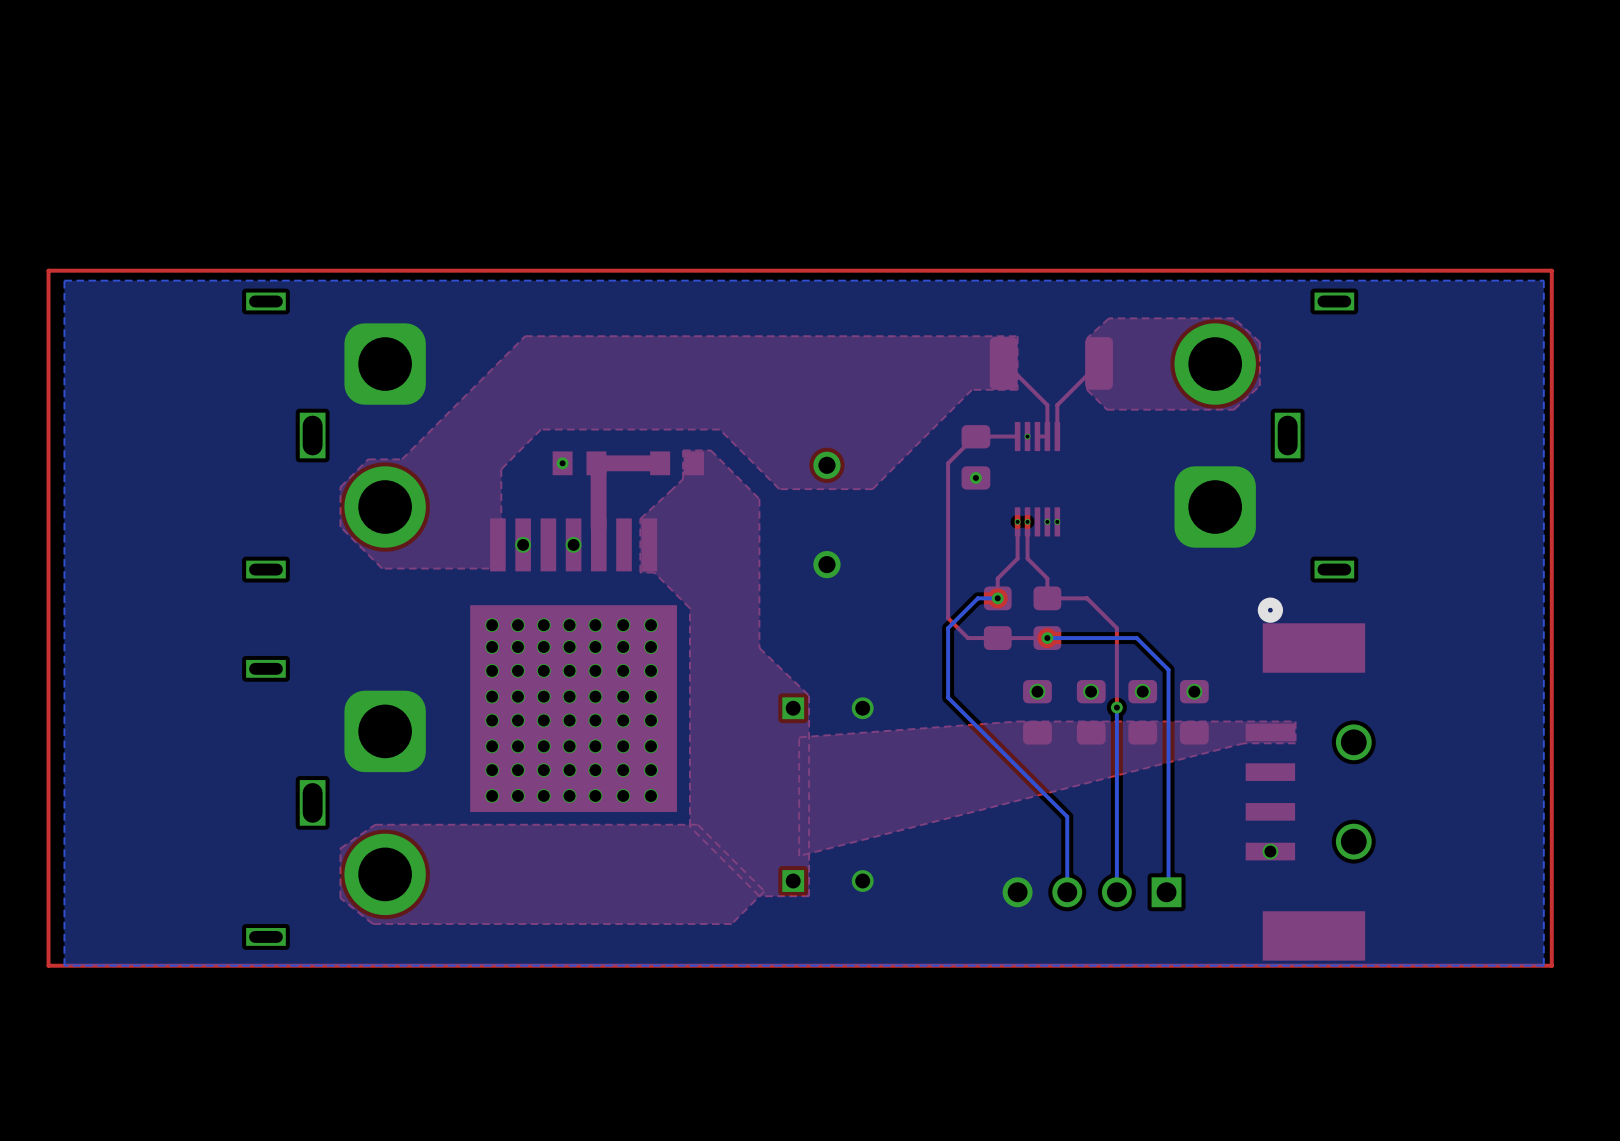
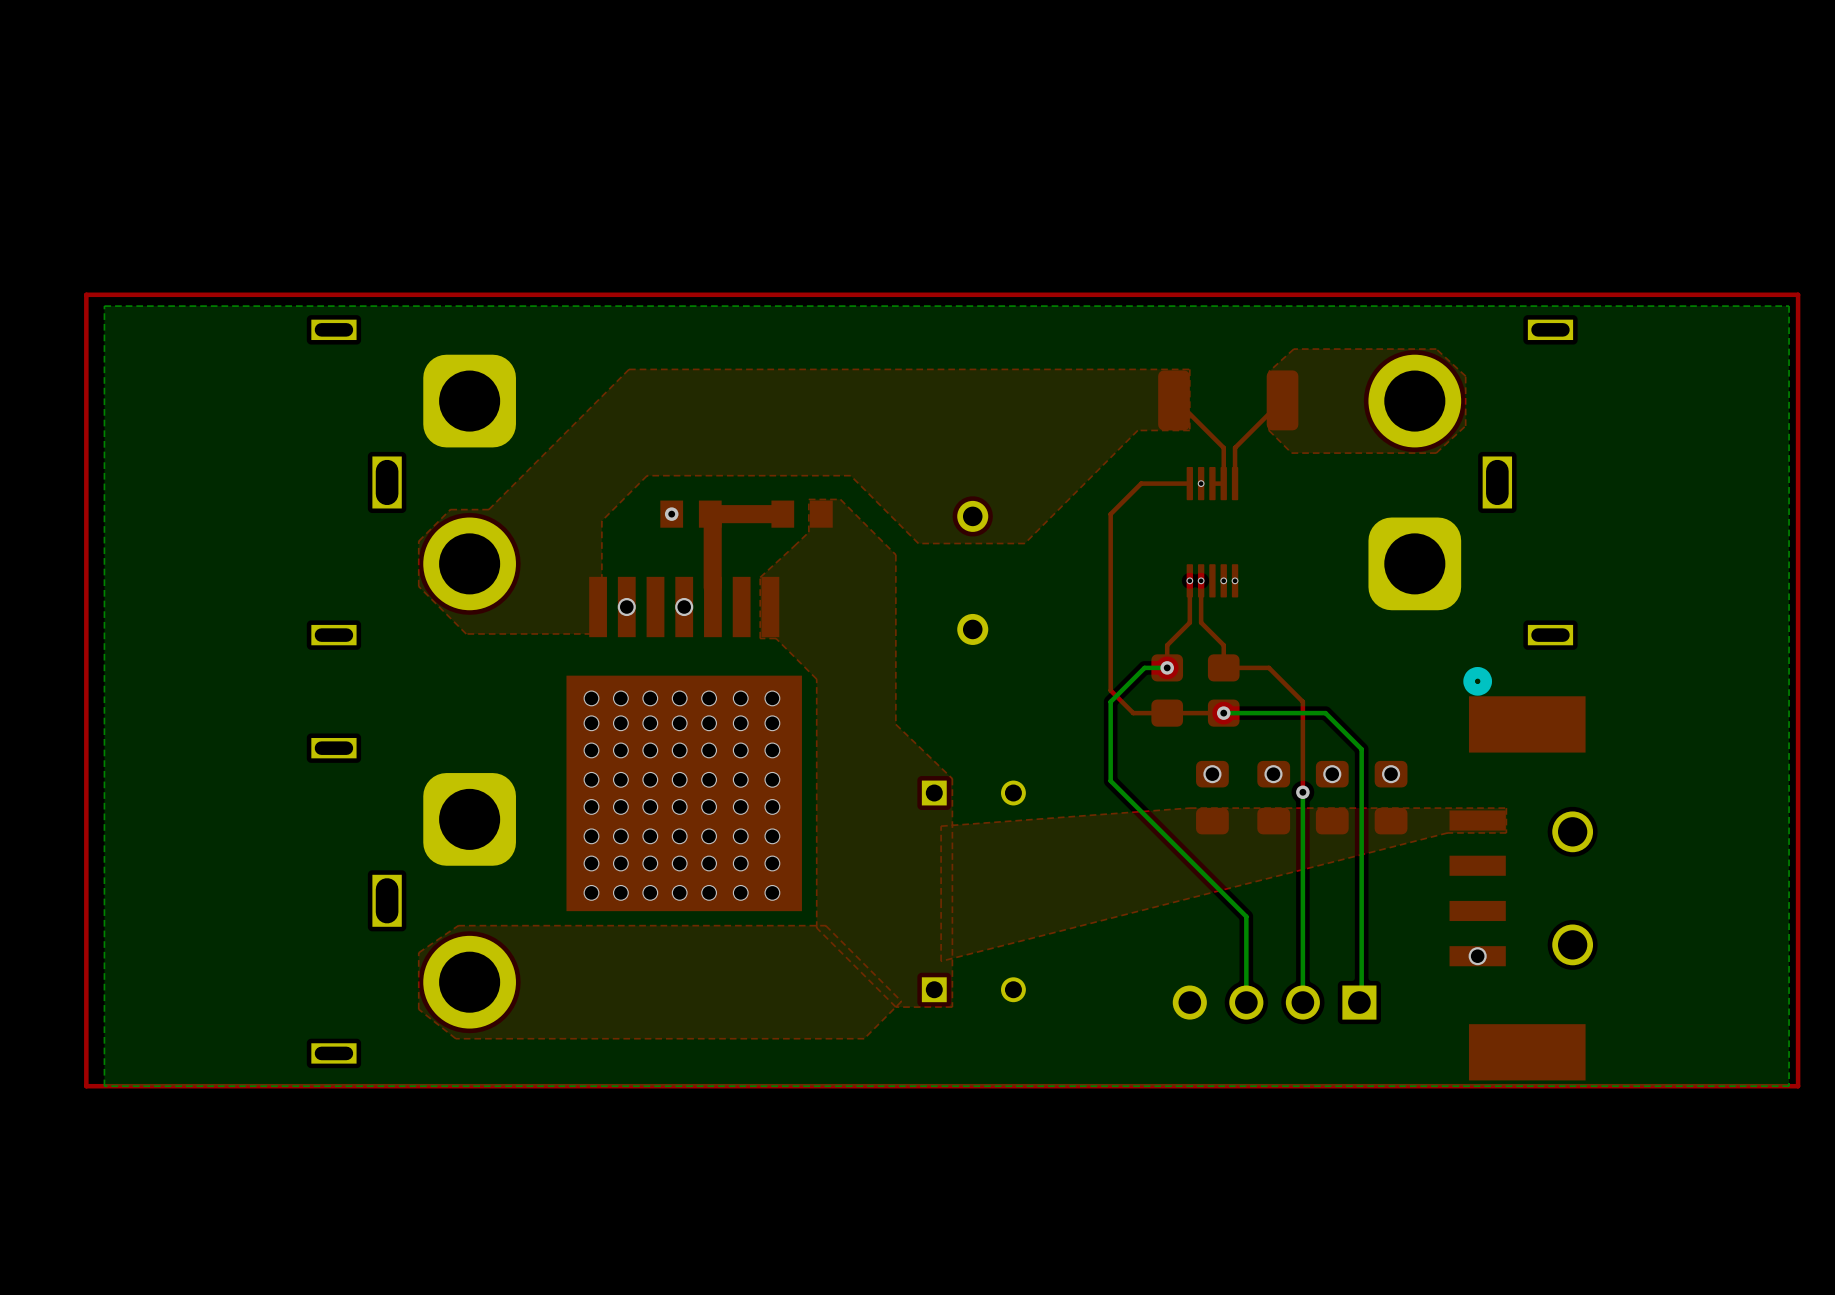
part: (975, 457) -> none
via: (975, 477) -> none

